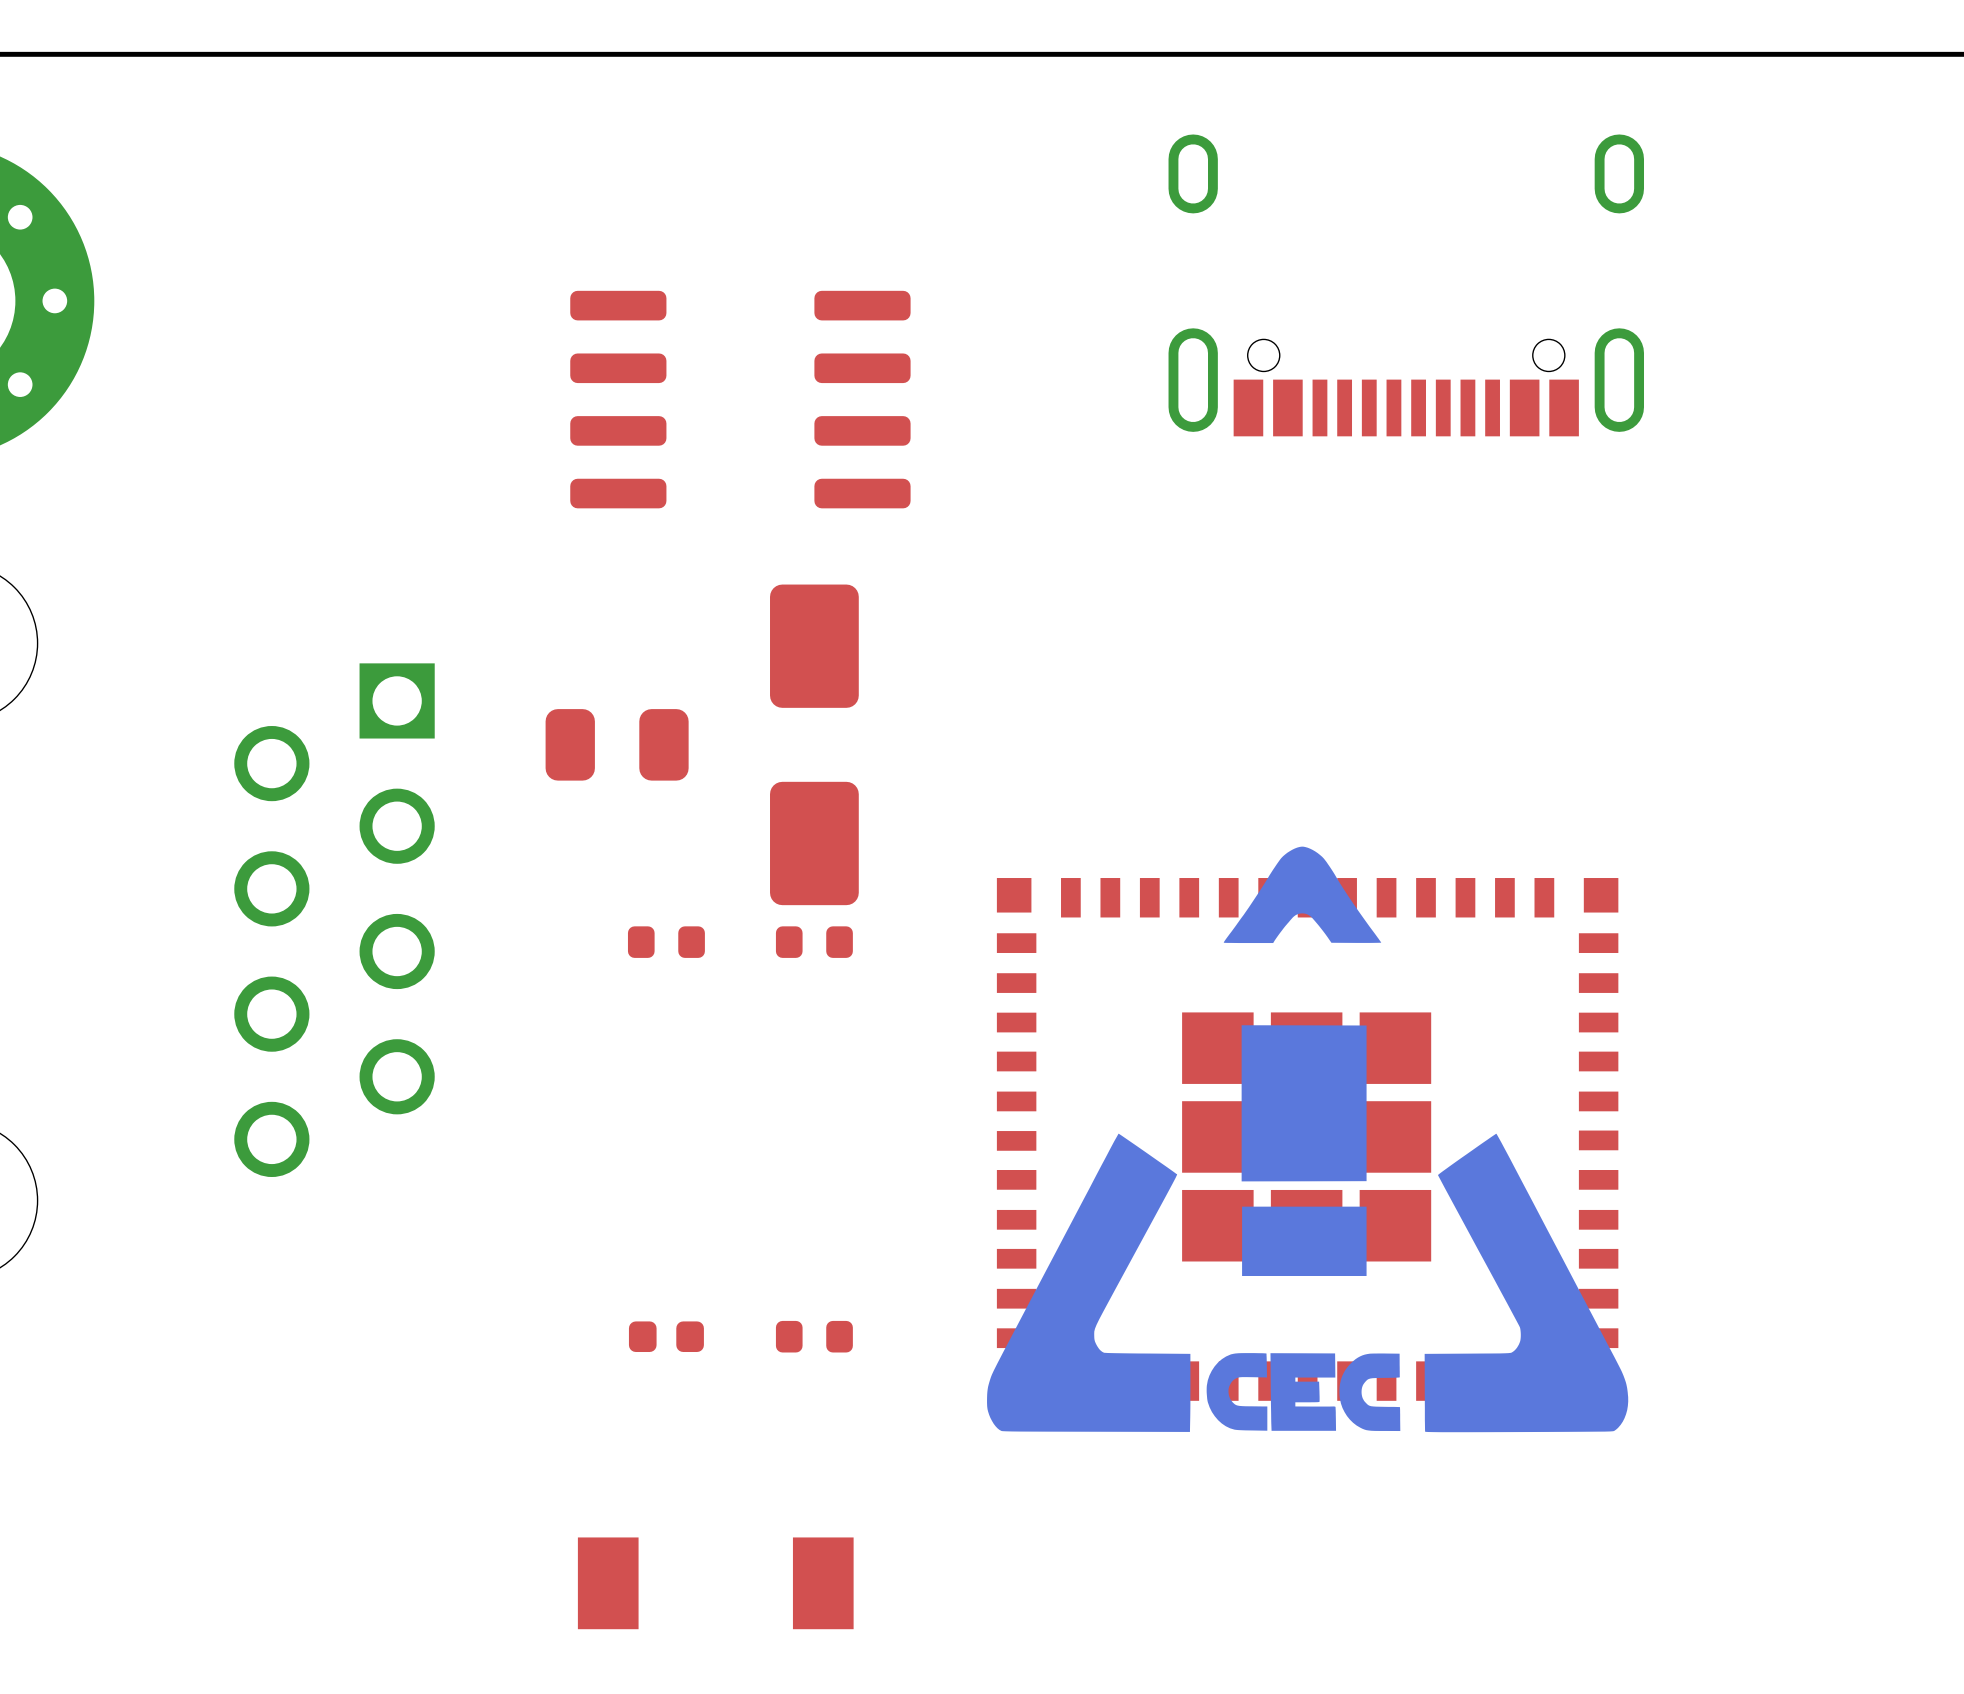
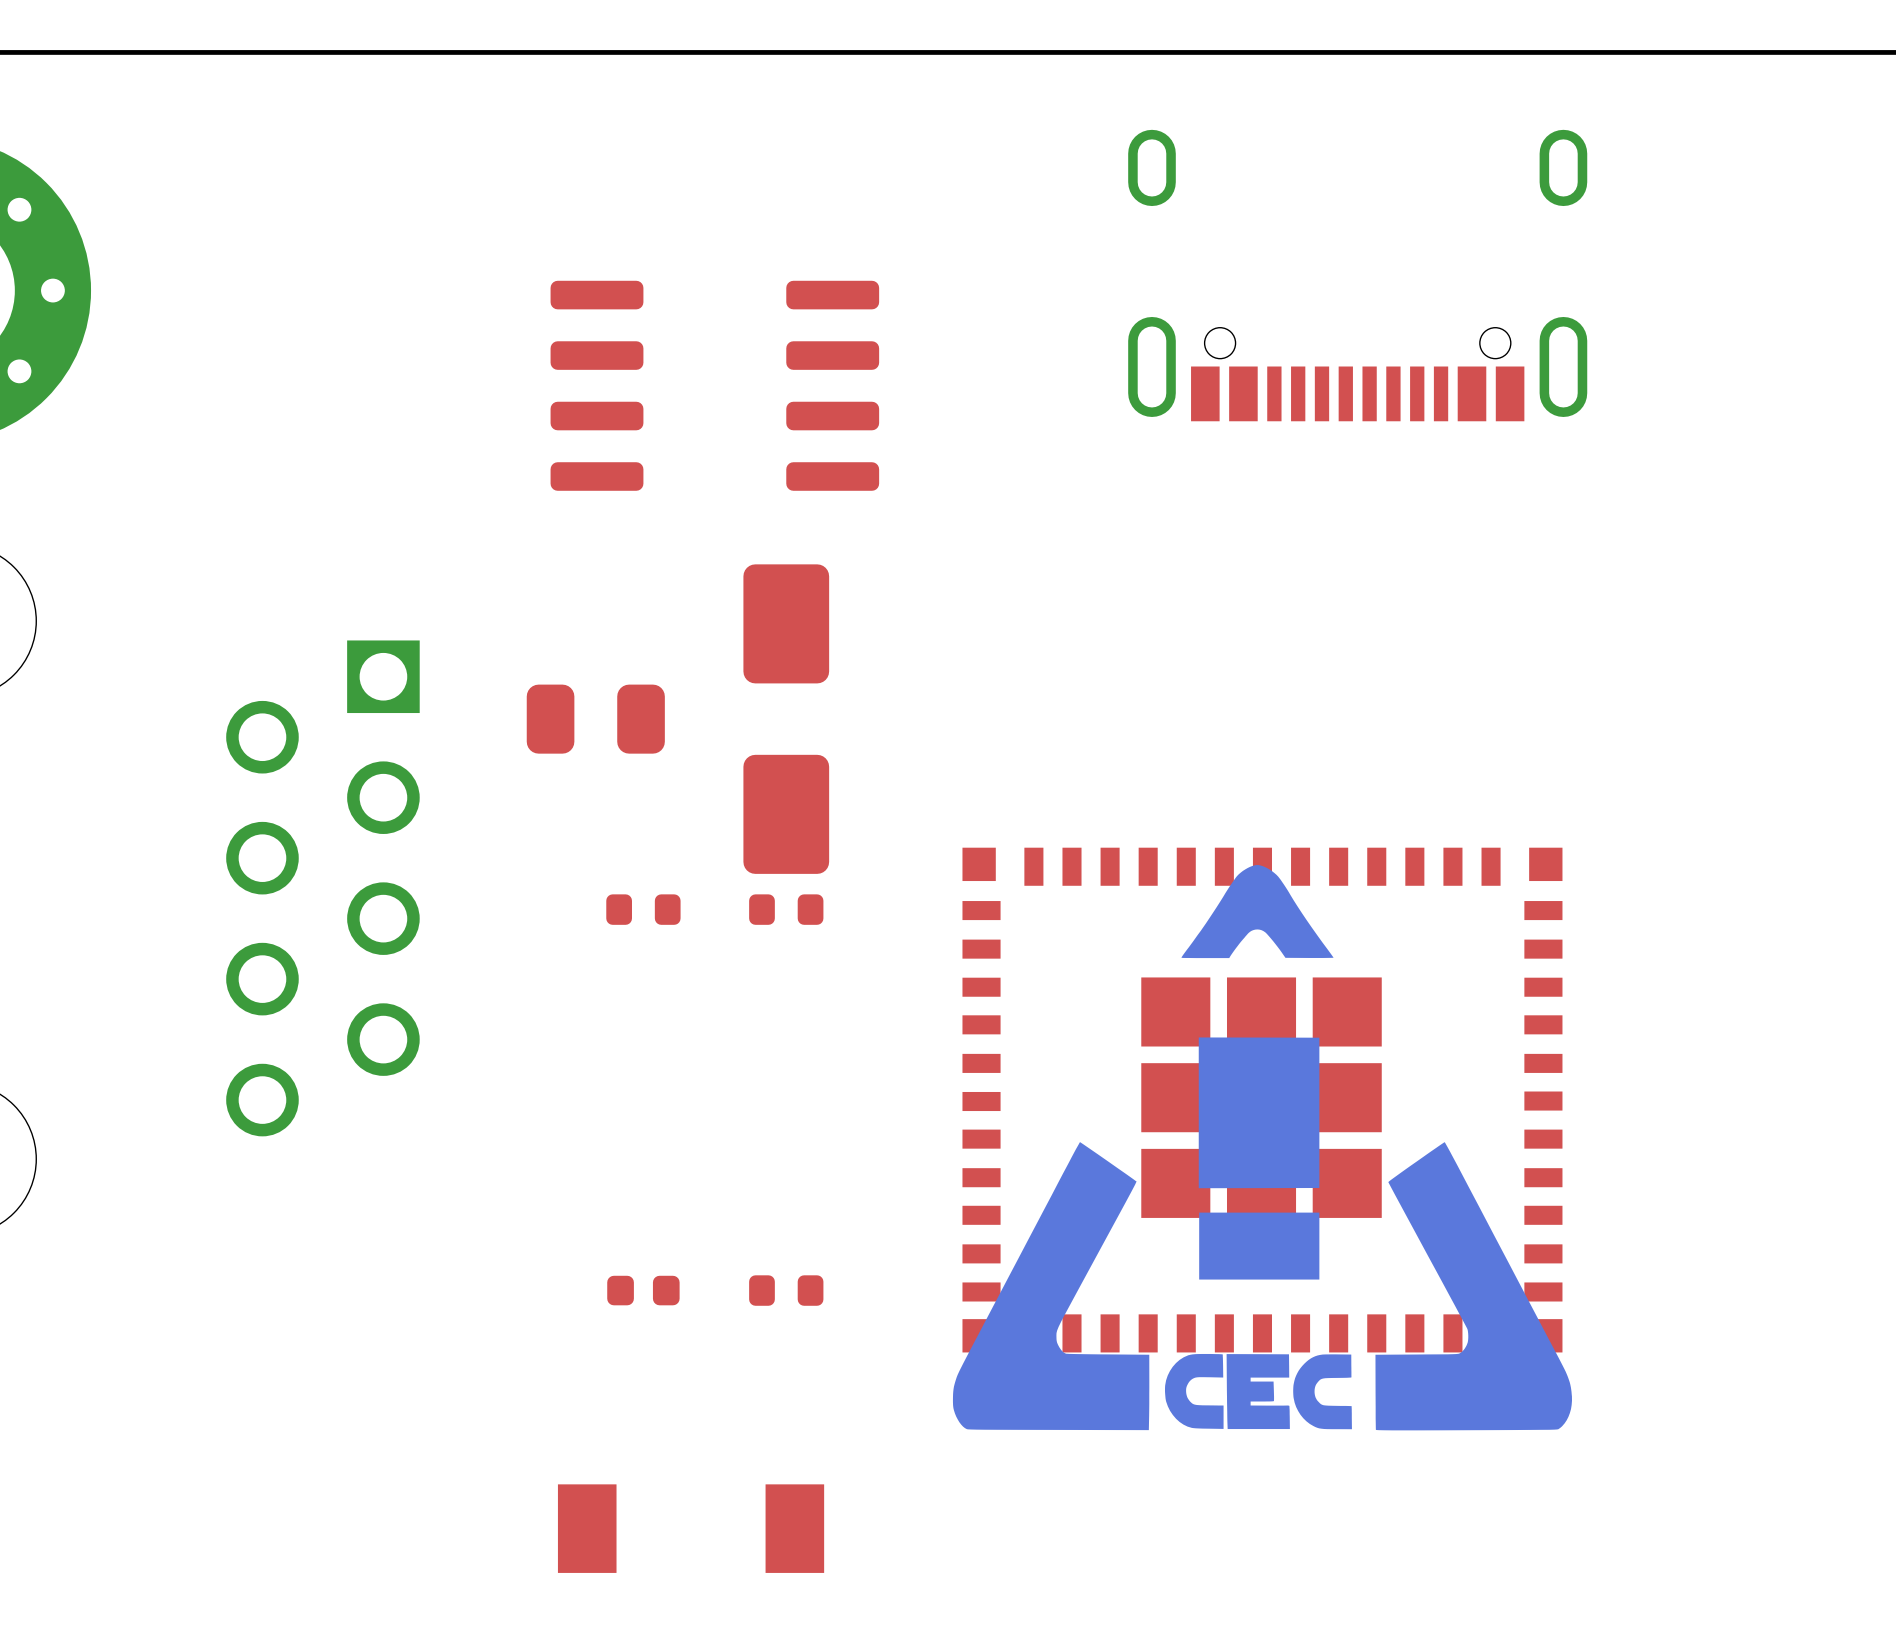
drawing position: (1307, 1139) -> (1262, 1147)

